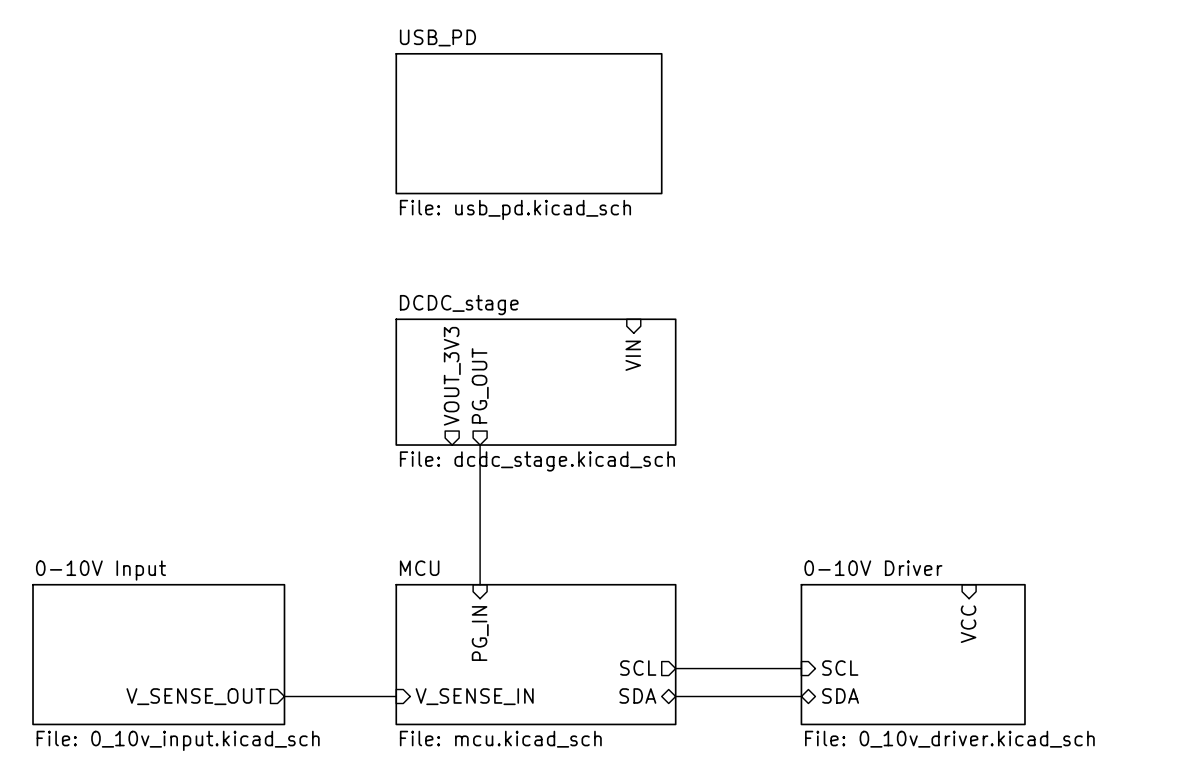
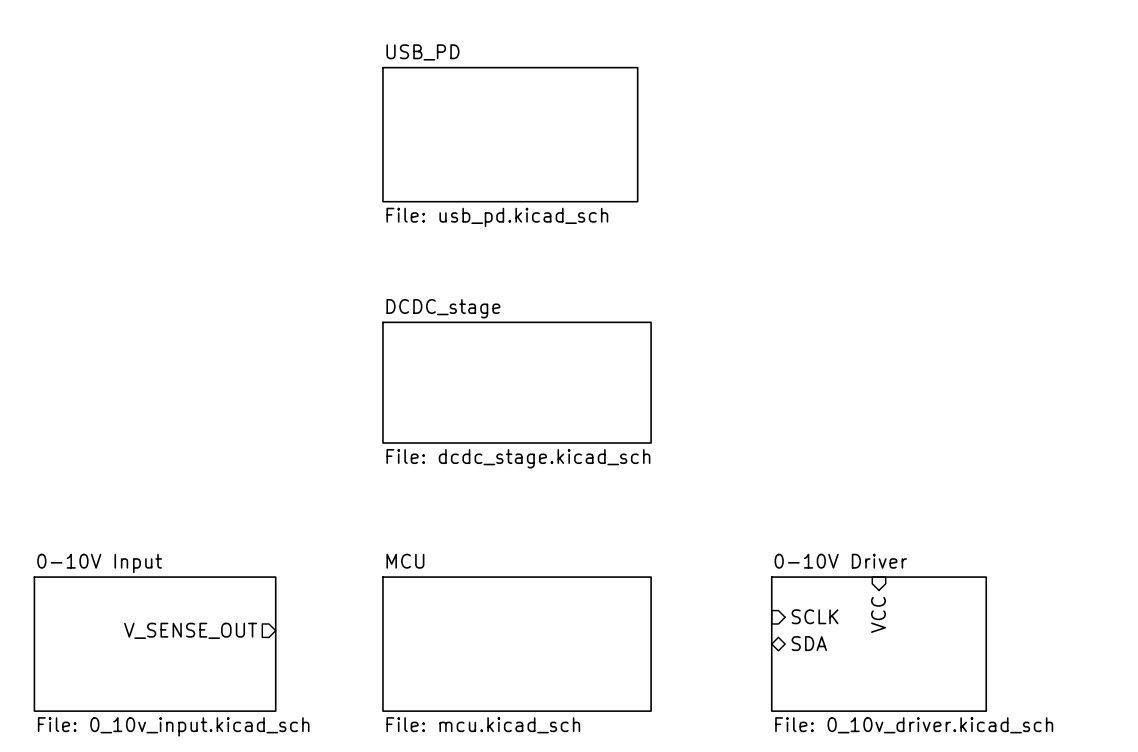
sheet pin: VIN (633, 355) -> none
sheet pin: VOUT_3V3 (452, 376) -> none
sheet pin: PG_OUT (480, 385) -> none
wire: (480, 445) (480, 584) -> none
sheet pin position: VCC (968, 624) -> VCC (878, 614)
sheet pin: none -> SCLK (815, 616)
sheet pin: PG_IN (480, 633) -> none
sheet pin: SCL (638, 668) -> none
wire: (675, 668) (801, 668) -> none
sheet pin: SCL (840, 668) -> none
sheet pin: SDA (637, 695) -> none
sheet pin position: SDA (840, 695) -> SDA (809, 643)
sheet pin position: V_SENSE_OUT (195, 696) -> V_SENSE_OUT (190, 630)
wire: (284, 696) (396, 696) -> none
sheet pin: V_SENSE_IN (474, 696) -> none
wire: (675, 696) (801, 696) -> none

